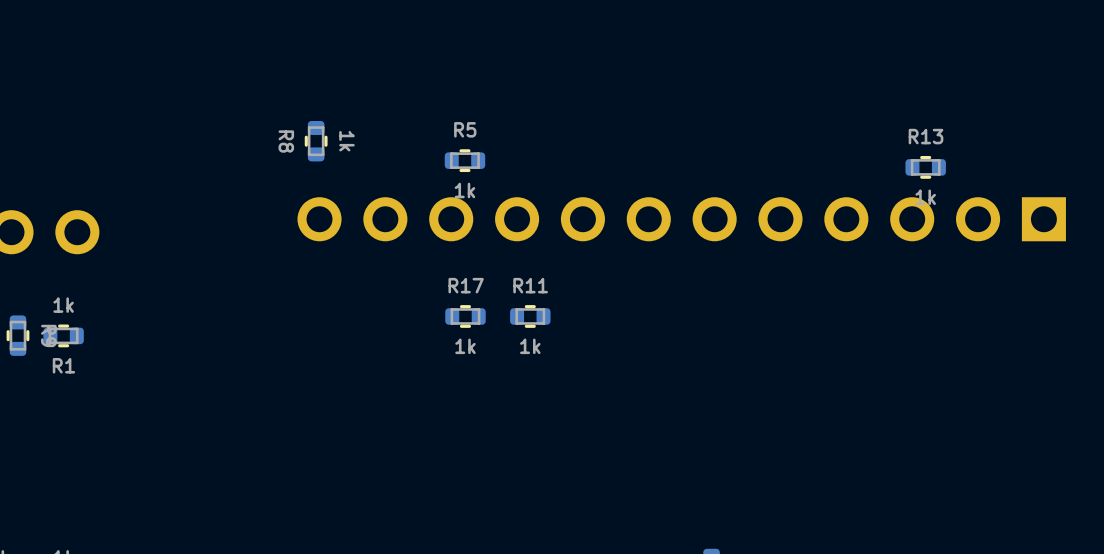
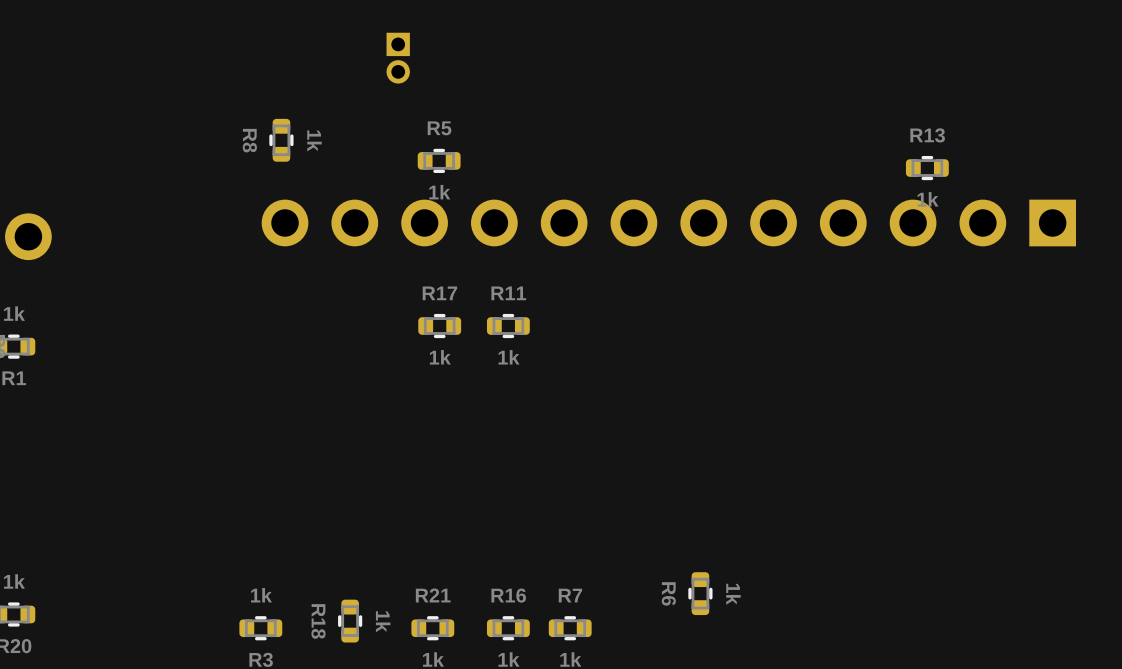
part: none -> (398, 58)

